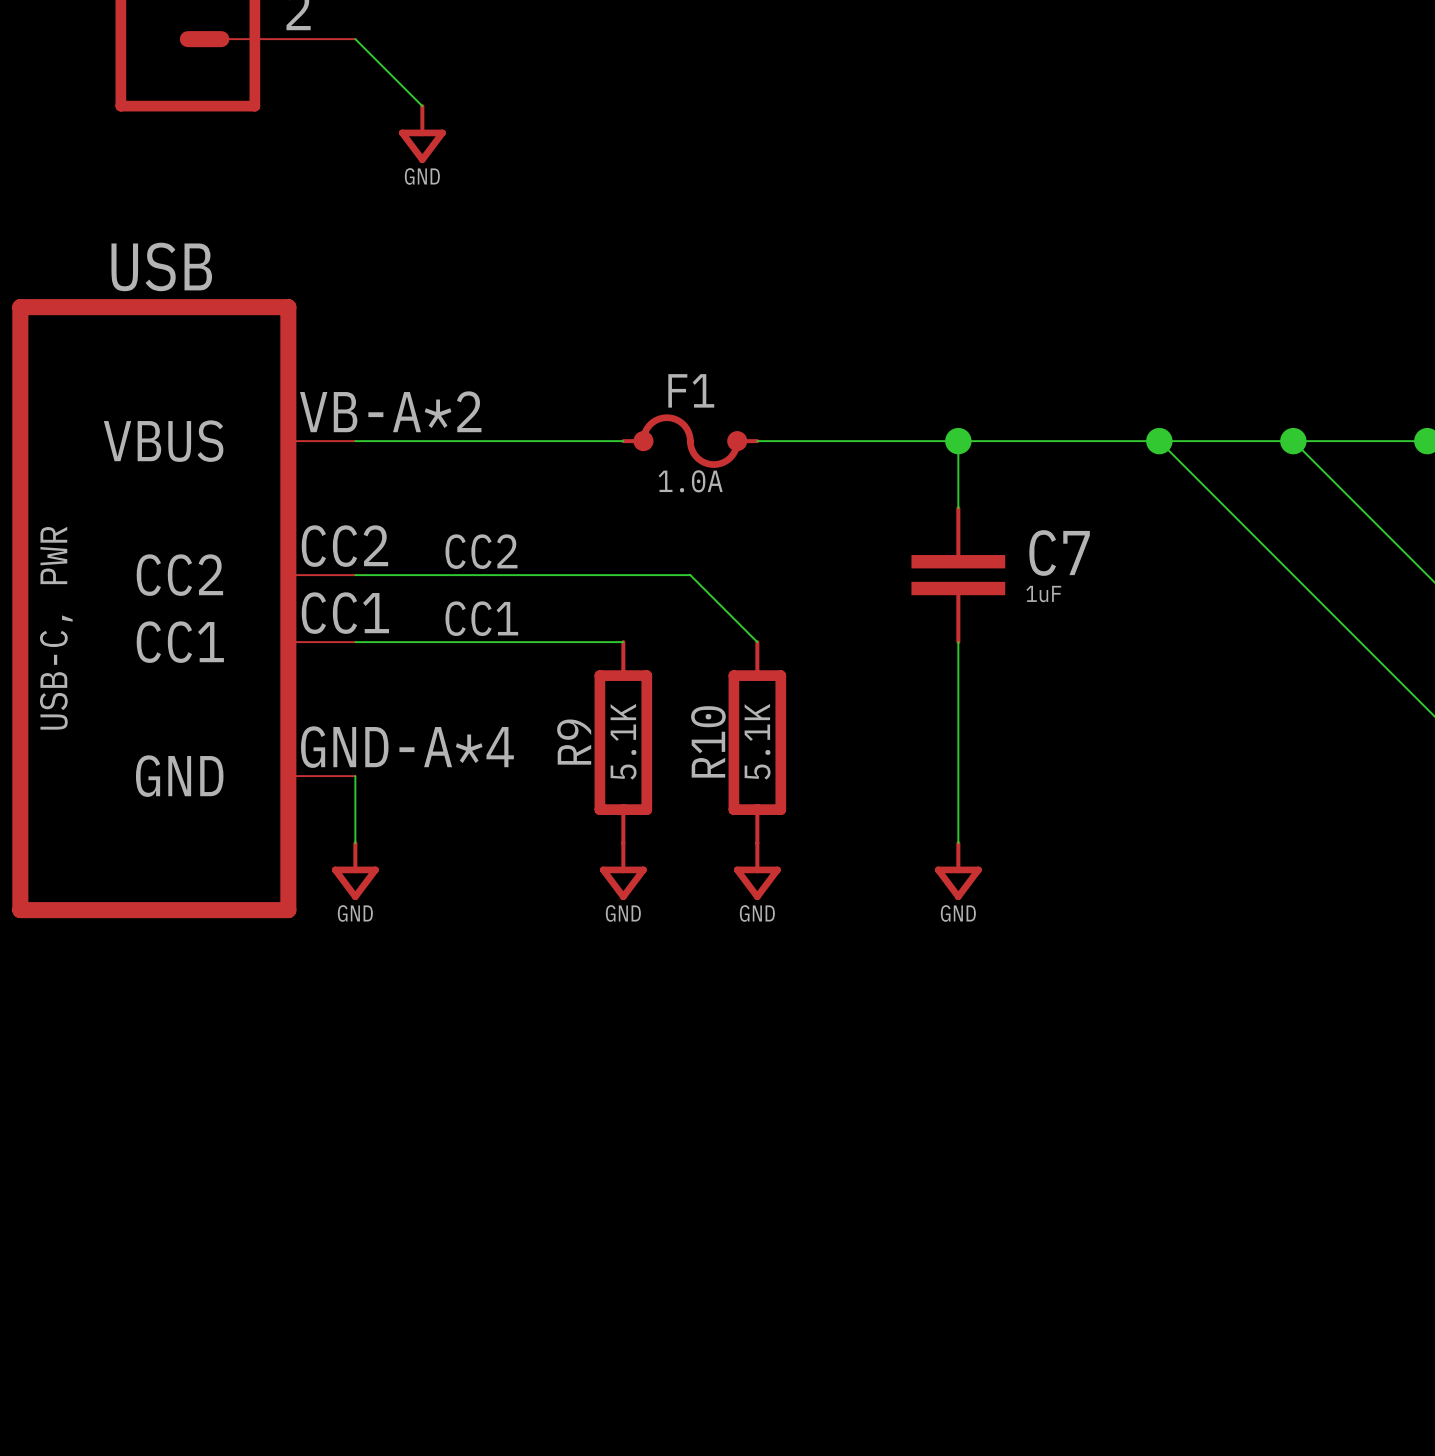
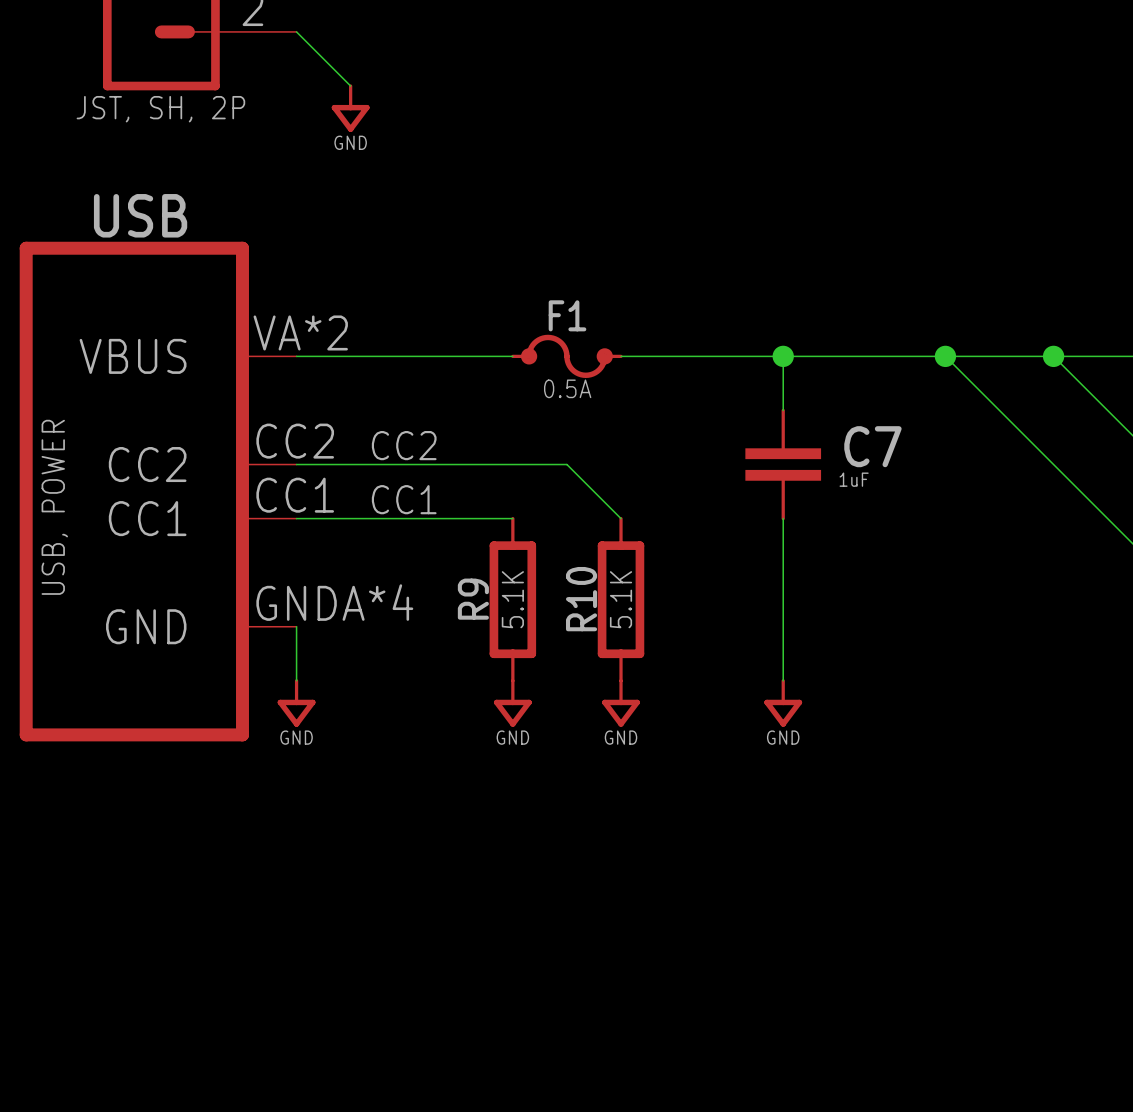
part value: none -> JST, SH, 2P (160, 109)
USB pin number: VB-A*2 (390, 411) -> VA*2 (300, 332)
F1 value: 1.0A (690, 481) -> 0.5A (567, 388)
USB value: USB-C, PWR (56, 628) -> USB, POWER (54, 507)
USB pin number: GND-A*4 (407, 747) -> GNDA*4 (334, 602)

